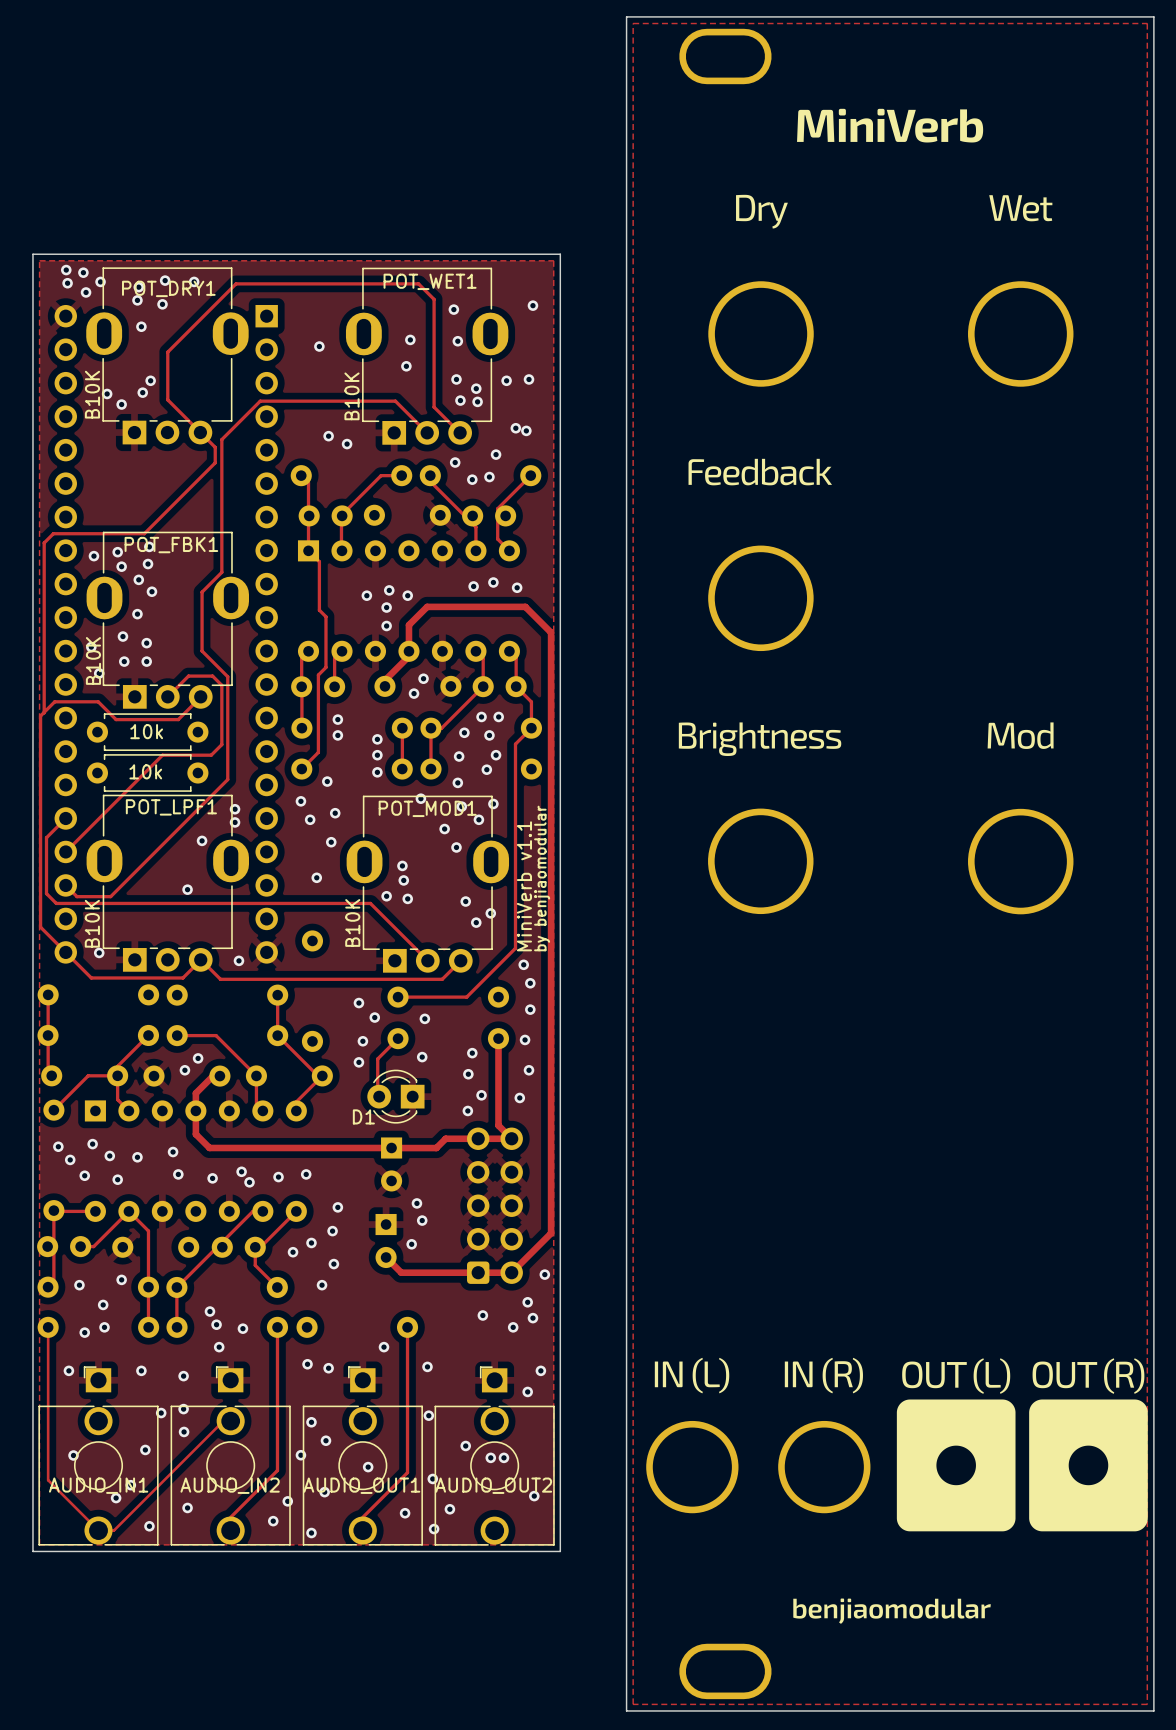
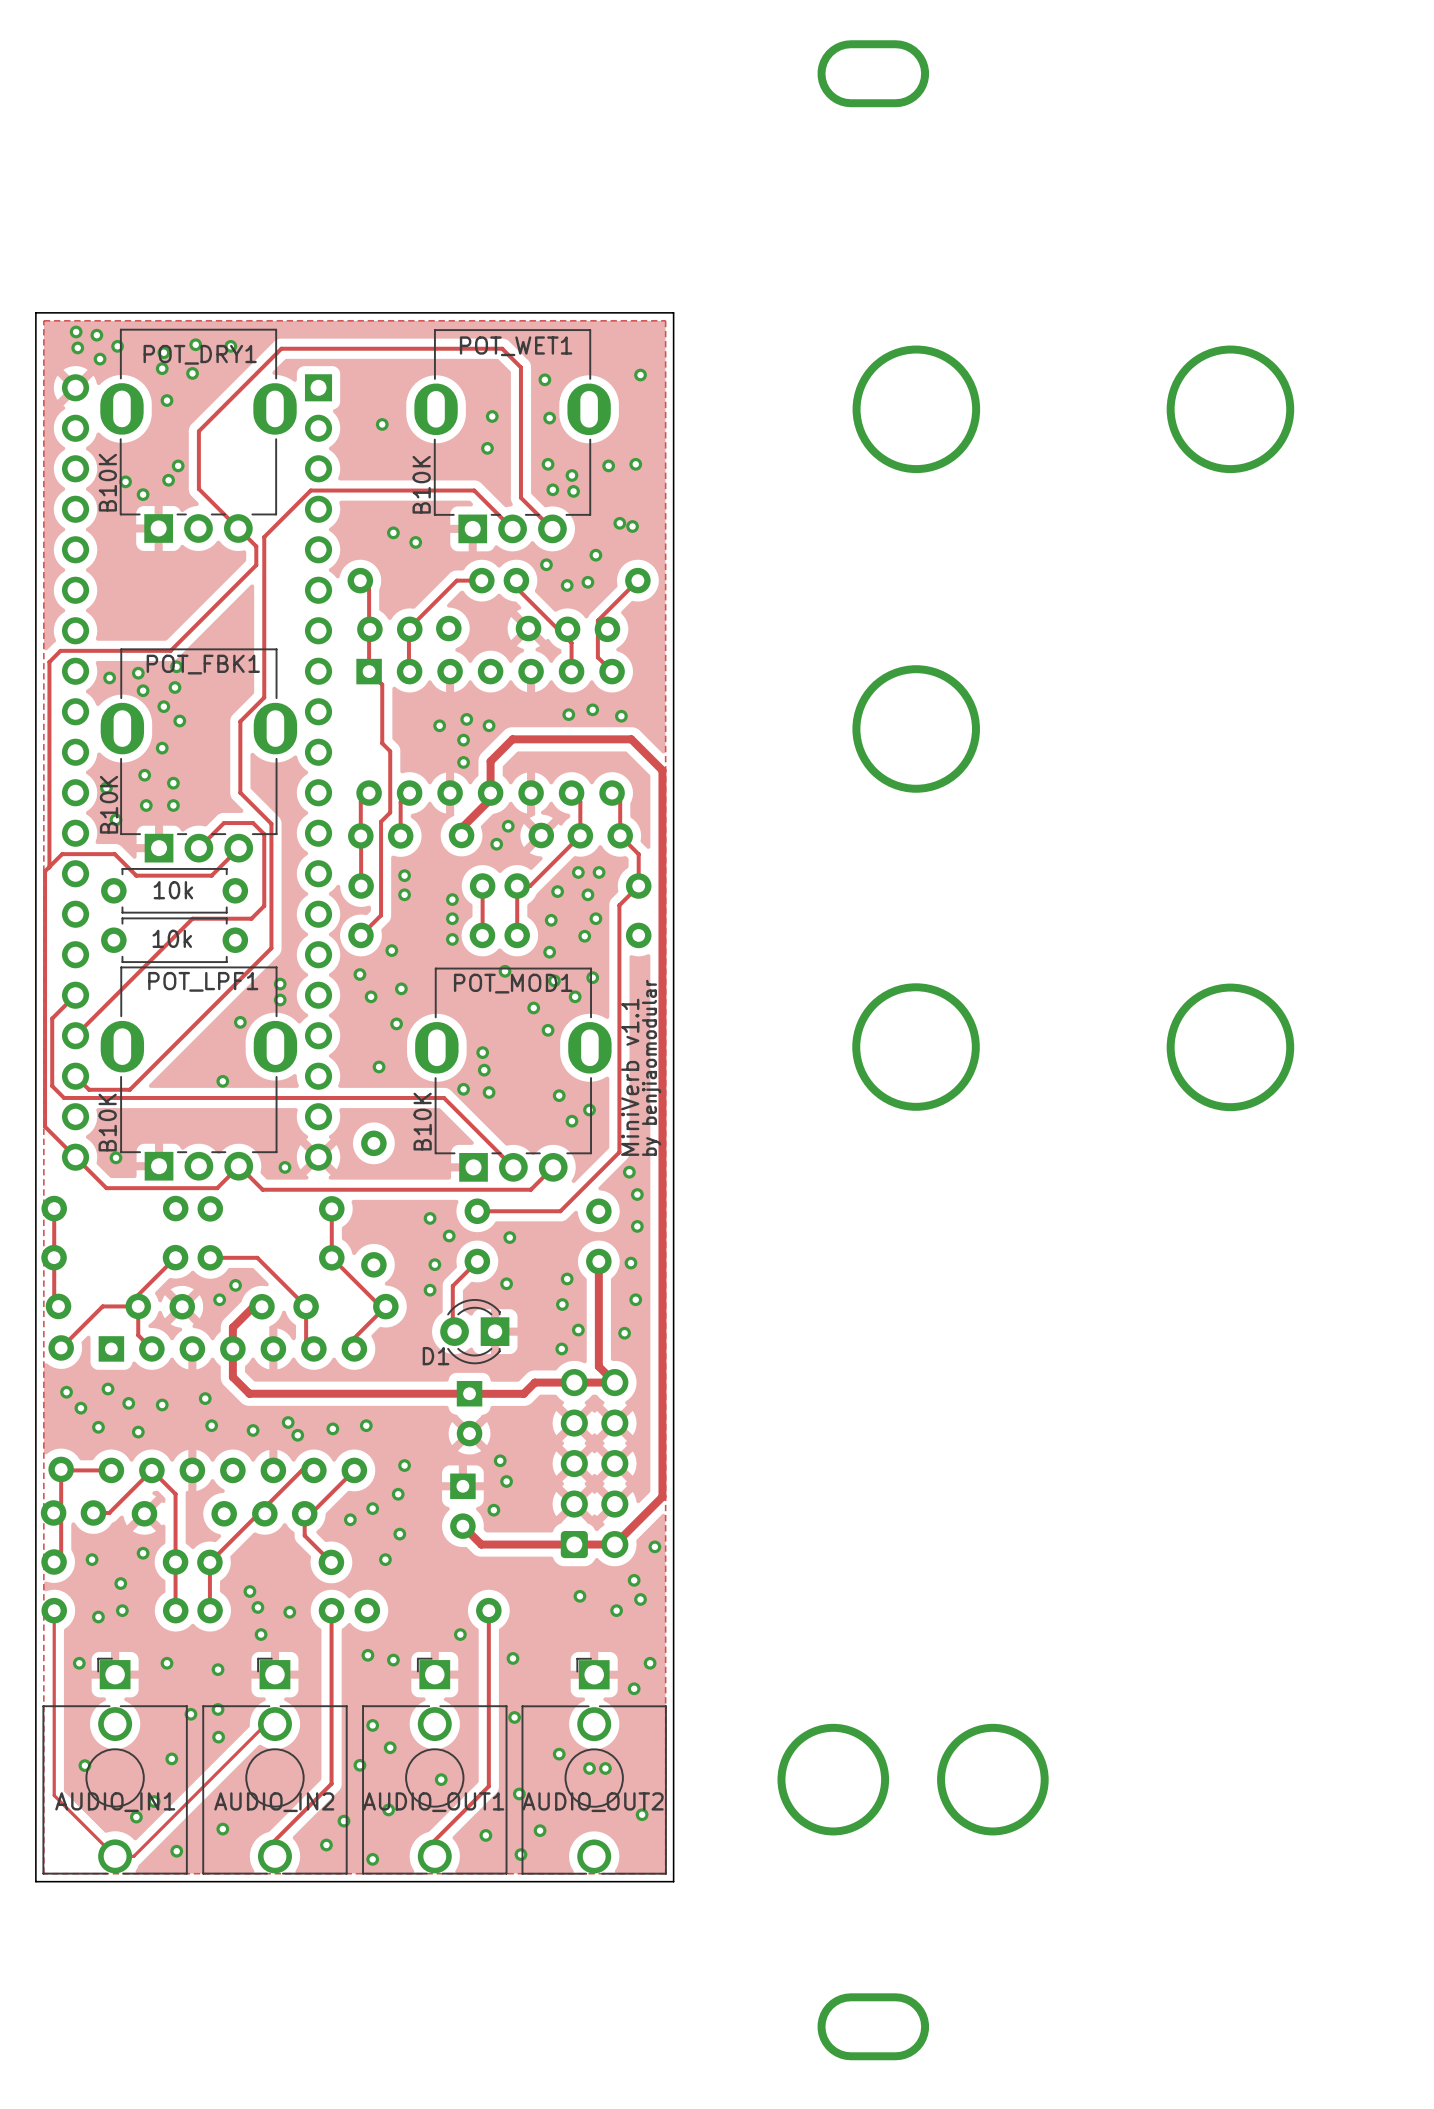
board edge: (626, 16) (626, 1710) (1153, 1710) (1153, 16) (626, 16) -> none
zone outline: (633, 23) (633, 1704) (1147, 1704) (1147, 23) (633, 23) -> none
drawing: [797, 108, 984, 143] -> none
drawing: [736, 194, 788, 229] -> none
drawing: [989, 195, 1053, 222] -> none
drawing: [688, 458, 833, 486] -> none
drawing: [678, 722, 842, 756] -> none
drawing: [987, 722, 1054, 749] -> none
drawing: [654, 1357, 730, 1394] -> none
drawing: [784, 1357, 863, 1394] -> none
drawing: [896, 1358, 1148, 1532] -> none
drawing: [793, 1598, 991, 1624] -> none

